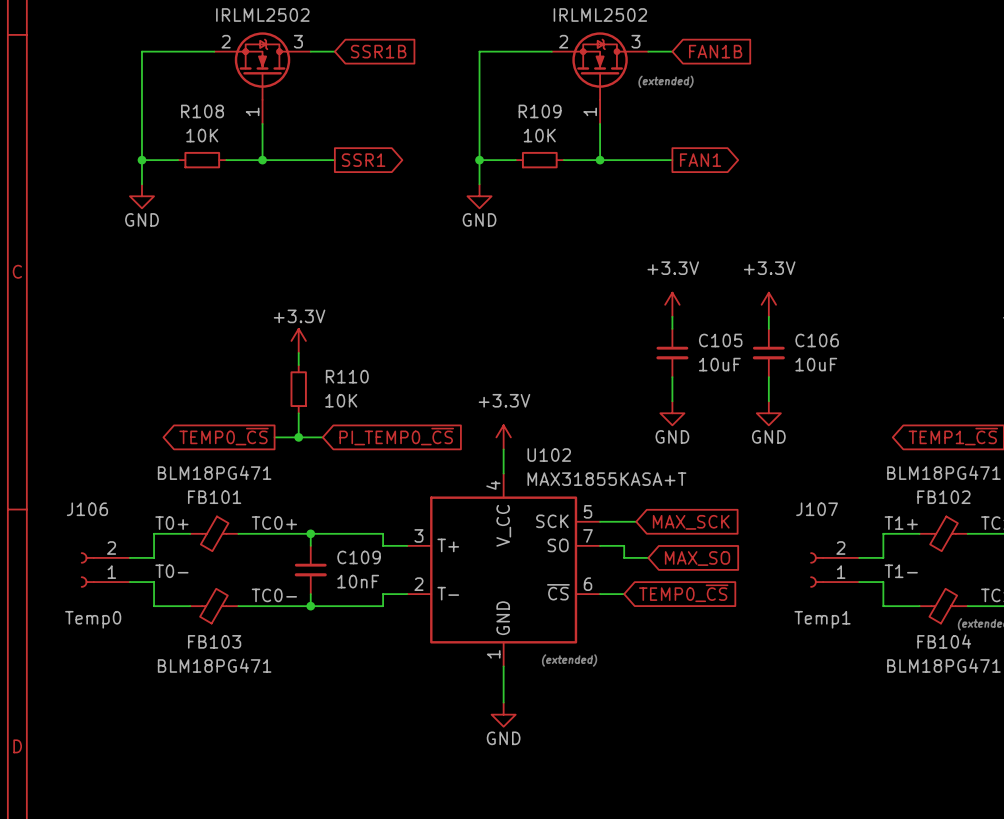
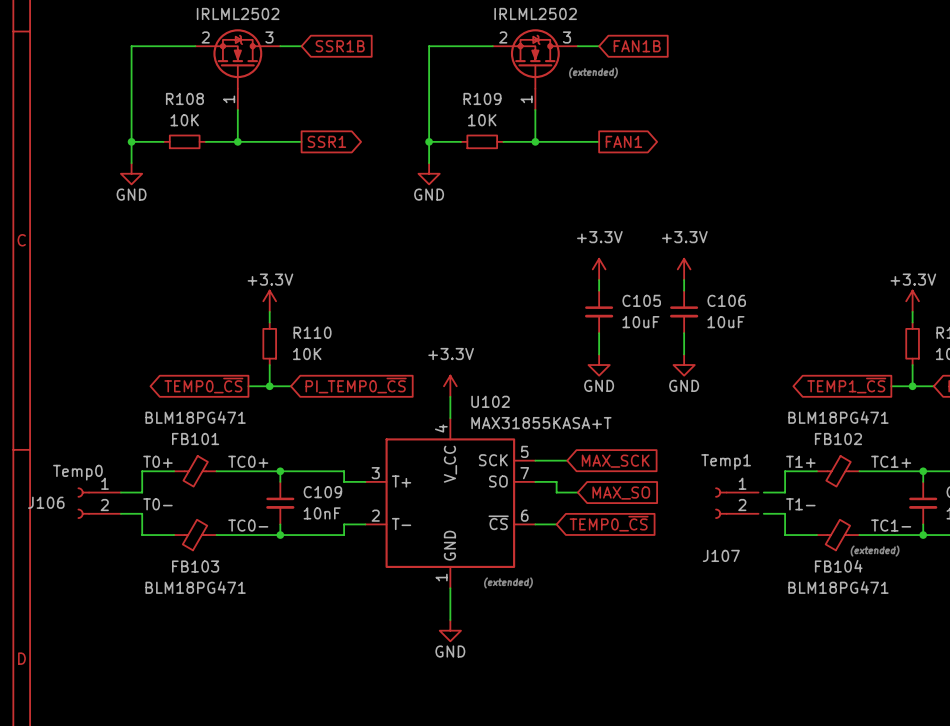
J106 name position: J106 (87, 509) -> J106 (46, 502)
J106 flip: as is (87, 569) -> up-down (83, 503)
J107 flip: as is (817, 569) -> up-down (721, 503)

